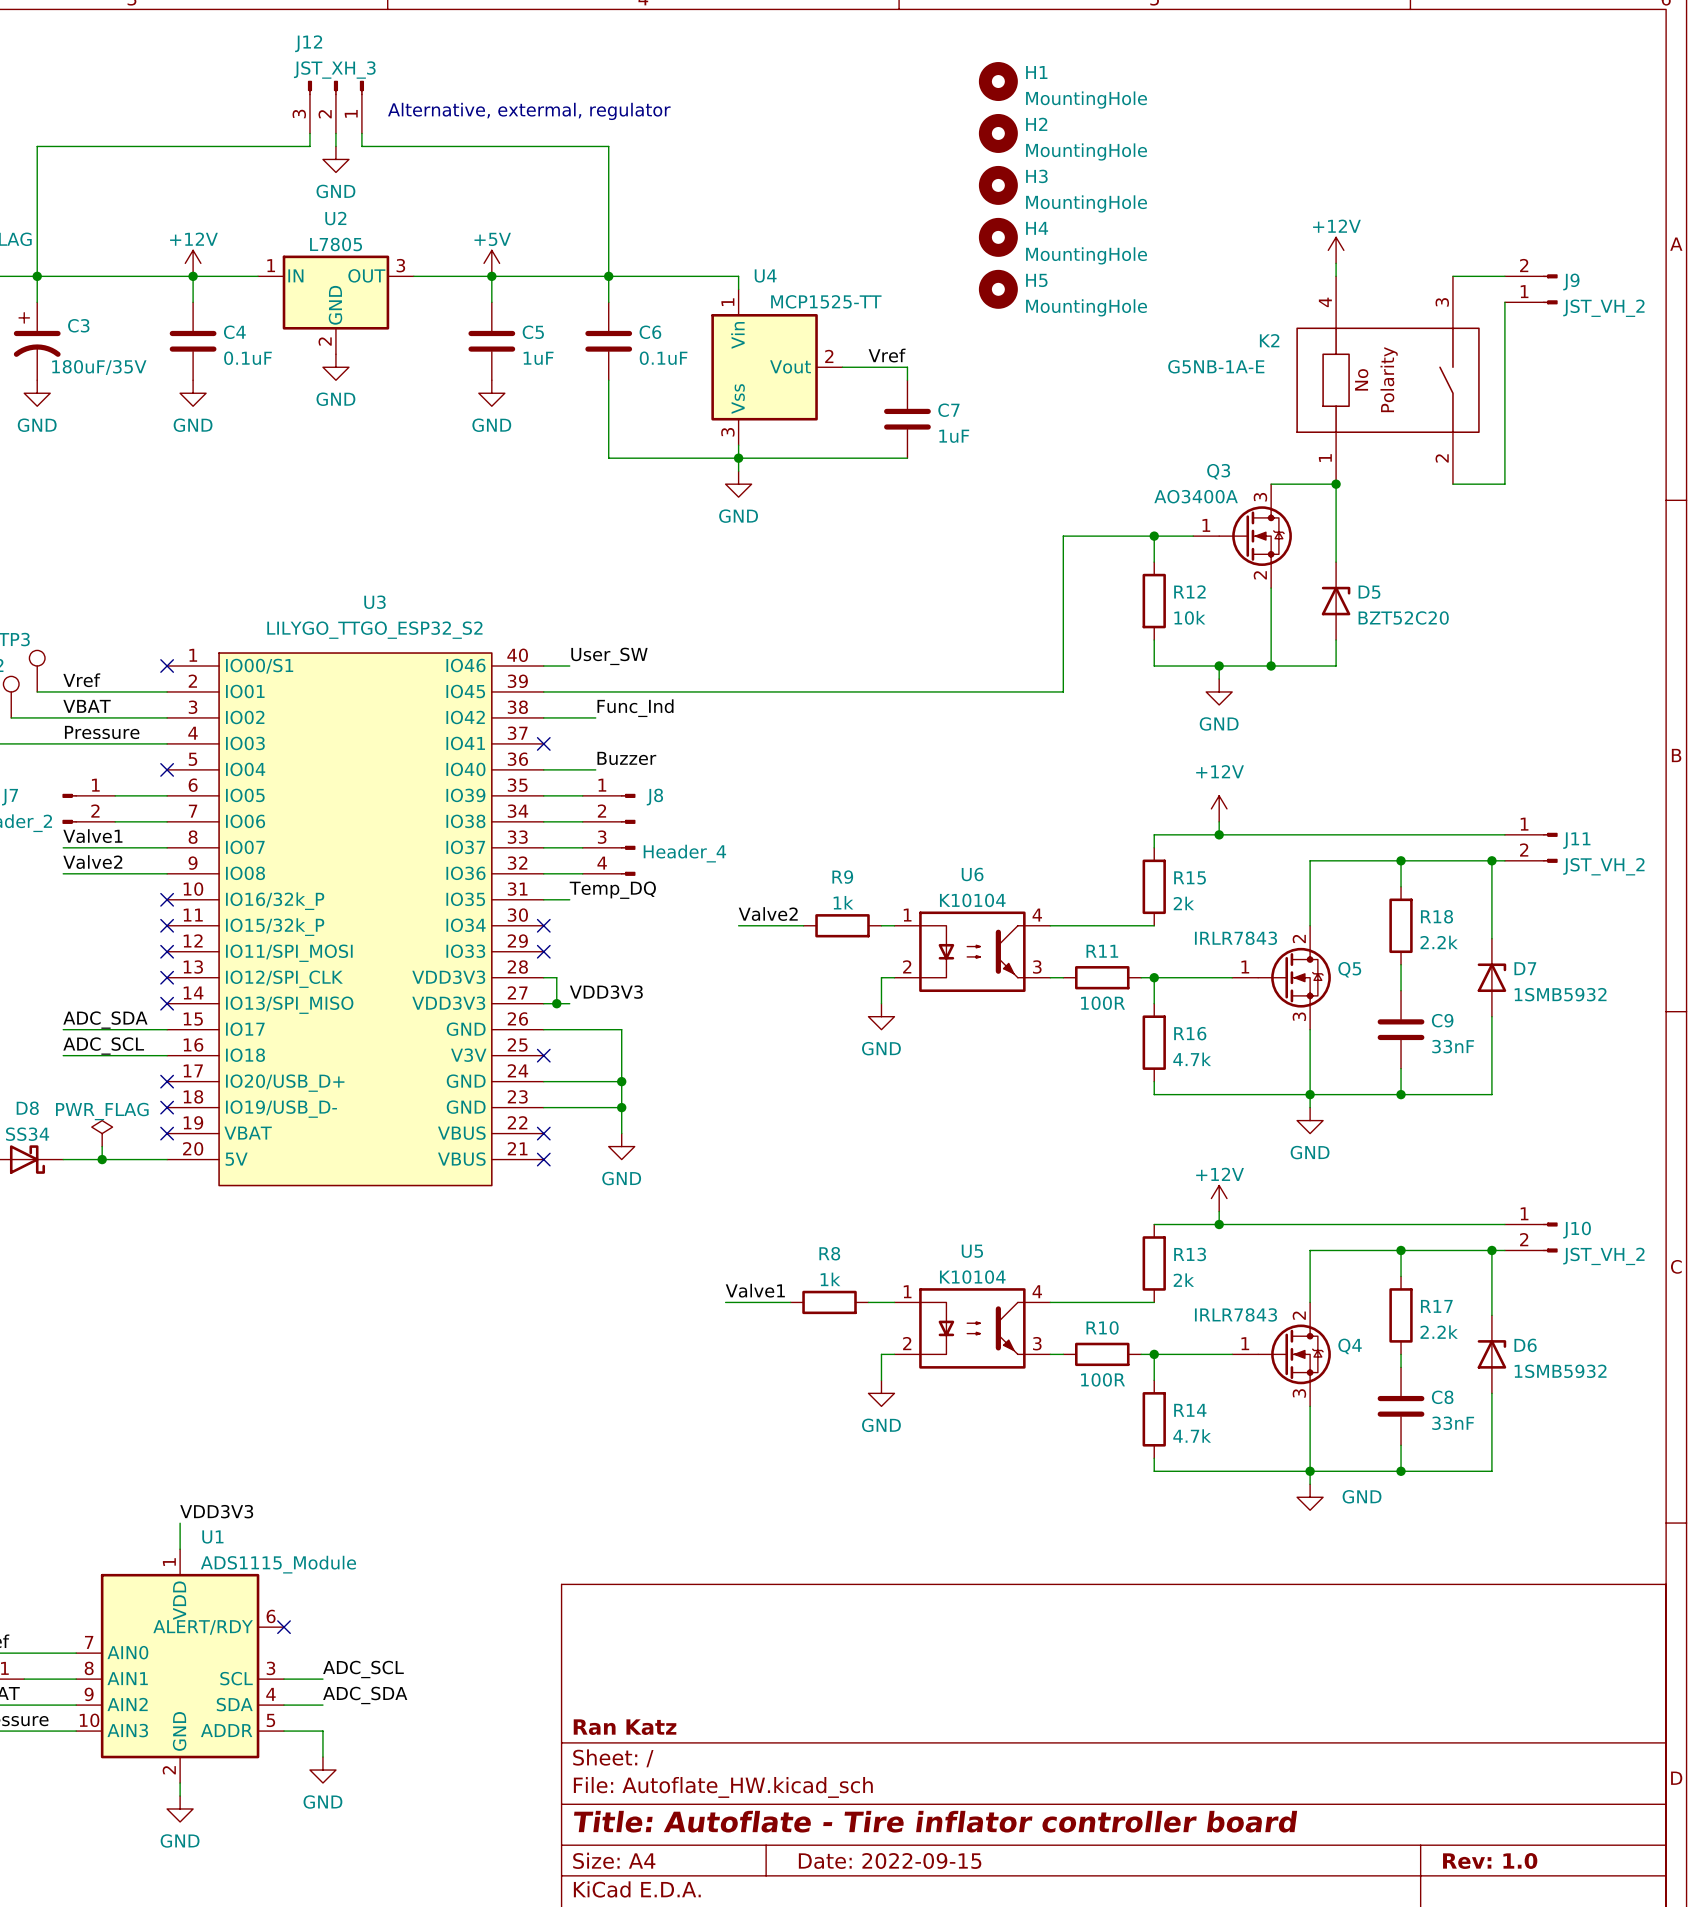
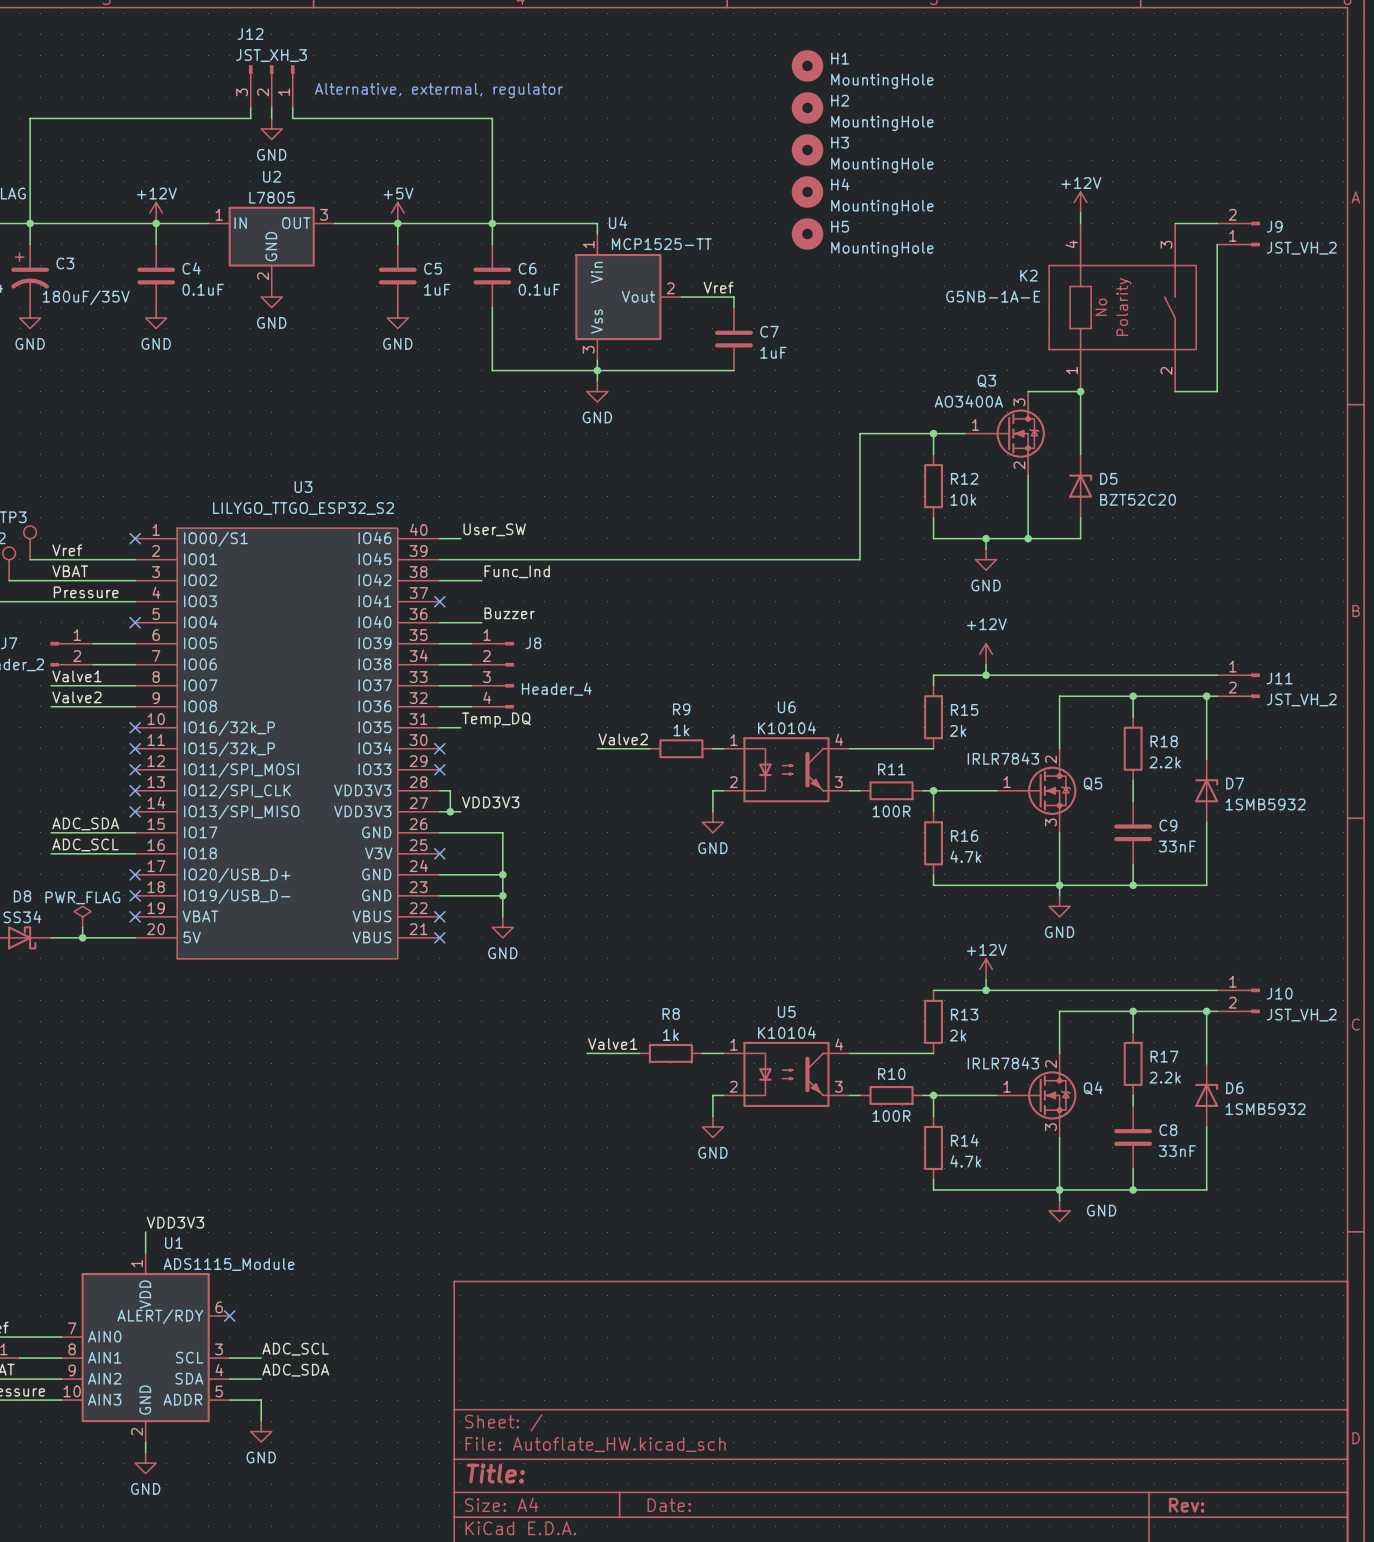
title block: Ran Katz (625, 1727) -> none
title block: Title: Autoflate - Tire inflator controller board (935, 1821) -> Title: (495, 1473)
title block: Date: 2022-09-15 (890, 1860) -> Date: (669, 1505)
title block: Rev: 1.0 (1490, 1860) -> Rev: (1186, 1505)

